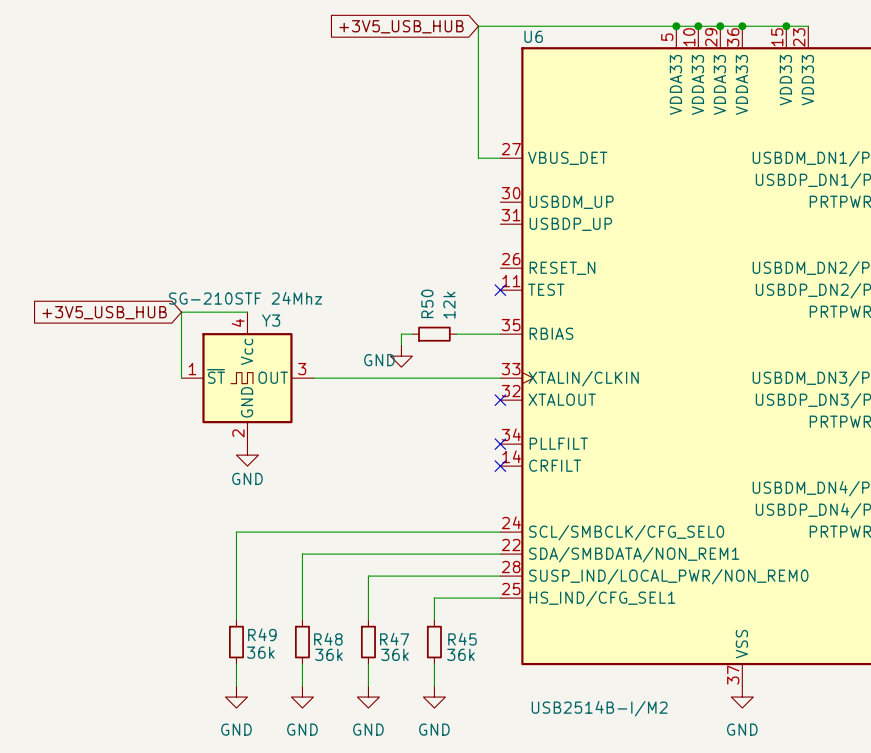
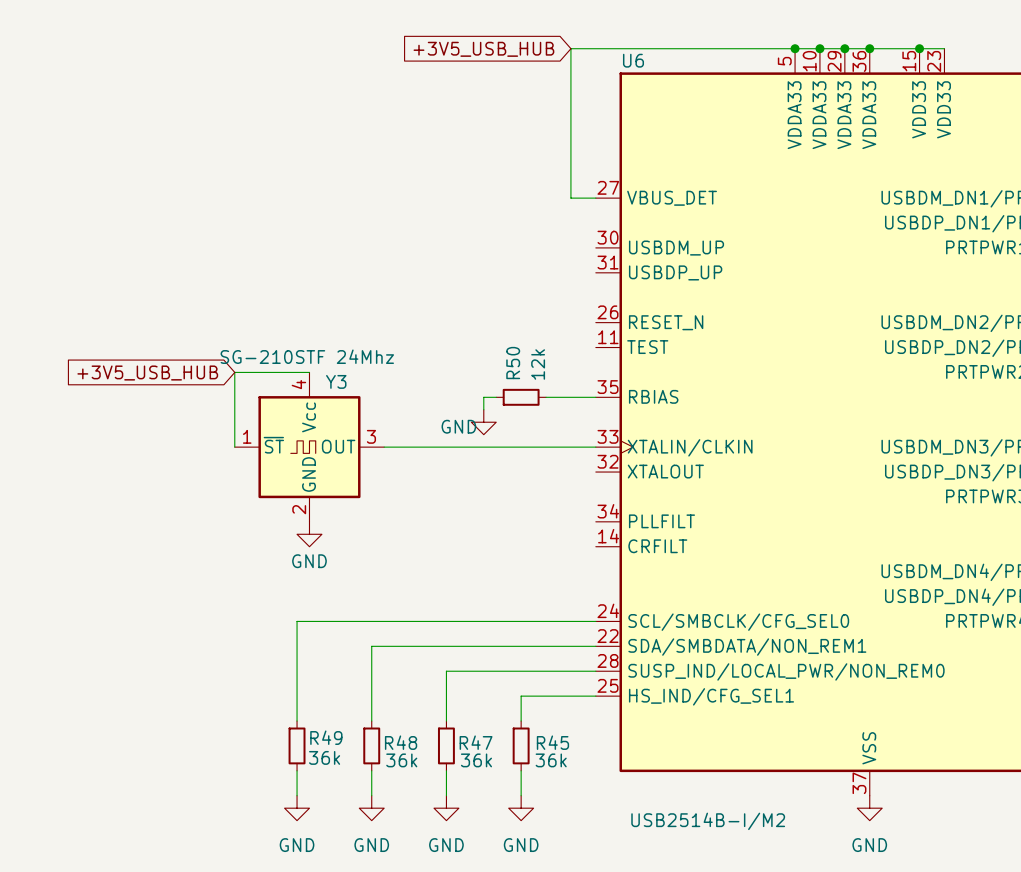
no-connect mark: (500, 290) -> none
no-connect mark: (500, 400) -> none
no-connect mark: (500, 444) -> none
no-connect mark: (500, 466) -> none

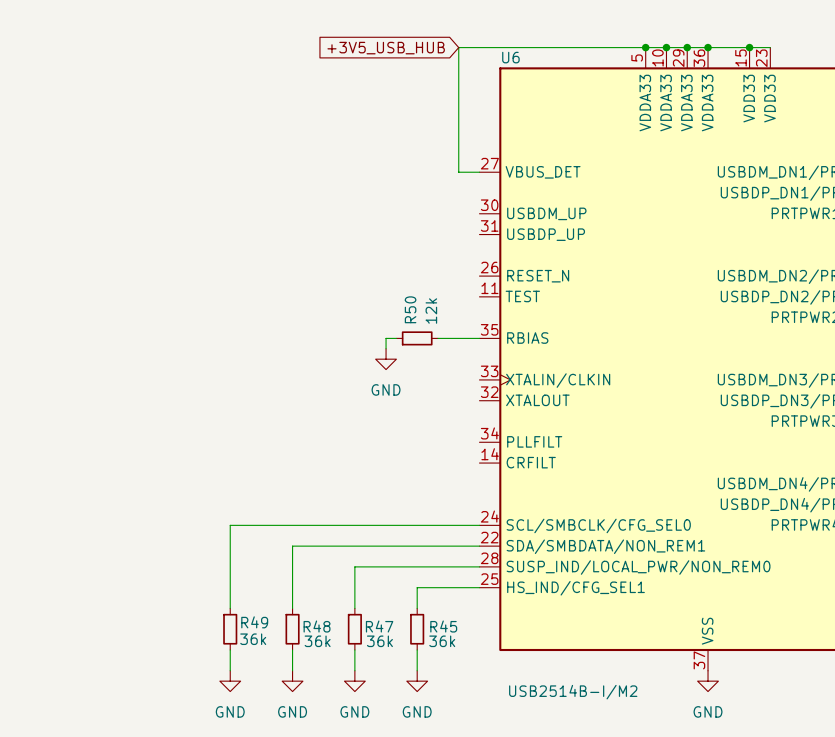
wire: (309, 372) (234, 372) (234, 447) -> none
global label: +3V5_USB_HUB (147, 373) -> none
power symbol text position: GND (458, 426) -> GND (386, 389)
Y3: SG-210STF 24Mhz (309, 447) -> none
wire: (384, 447) (595, 447) -> none
power symbol: GND (309, 534) -> none

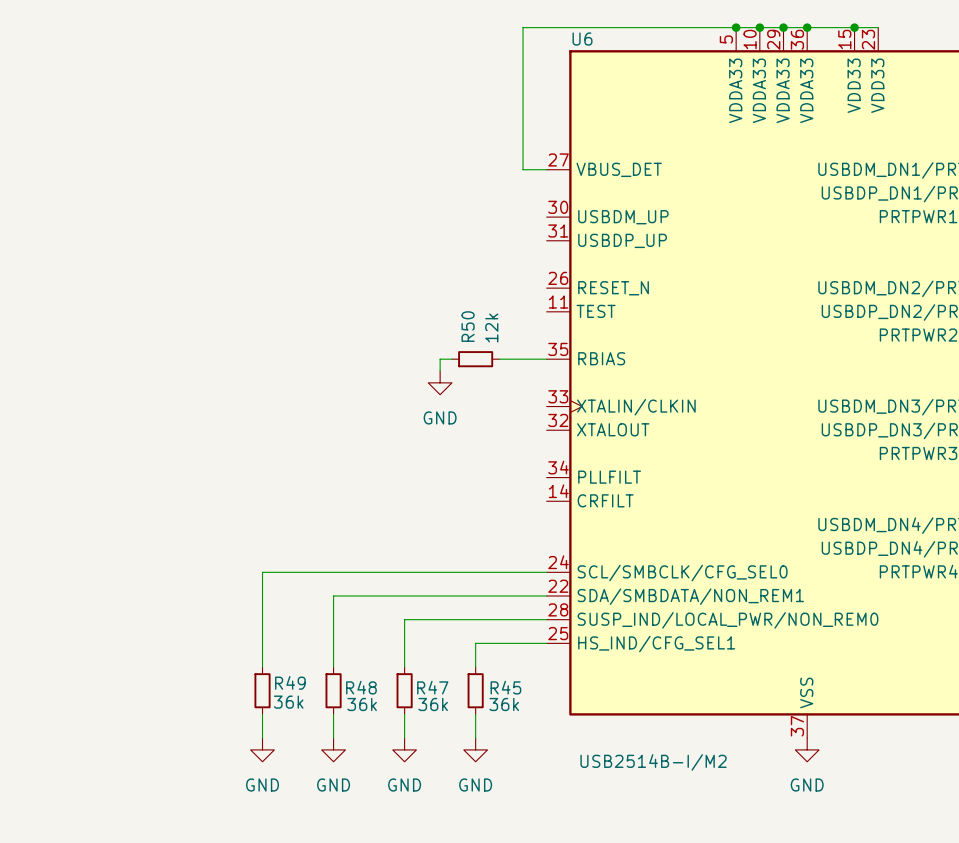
global label: +3V5_USB_HUB (386, 48) -> none

